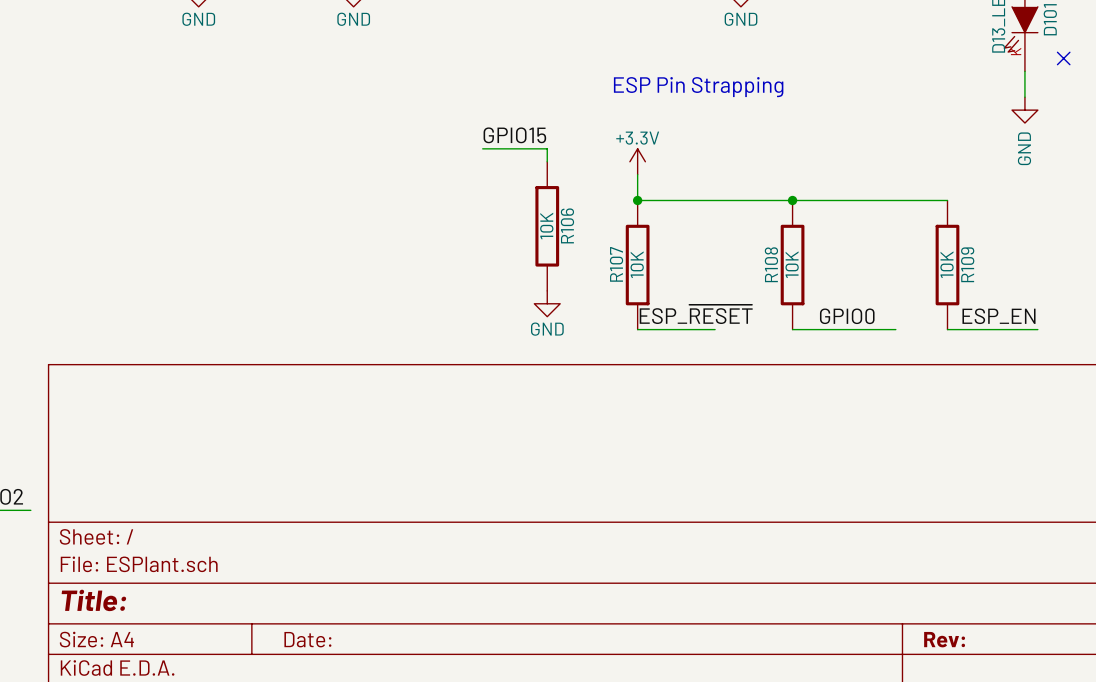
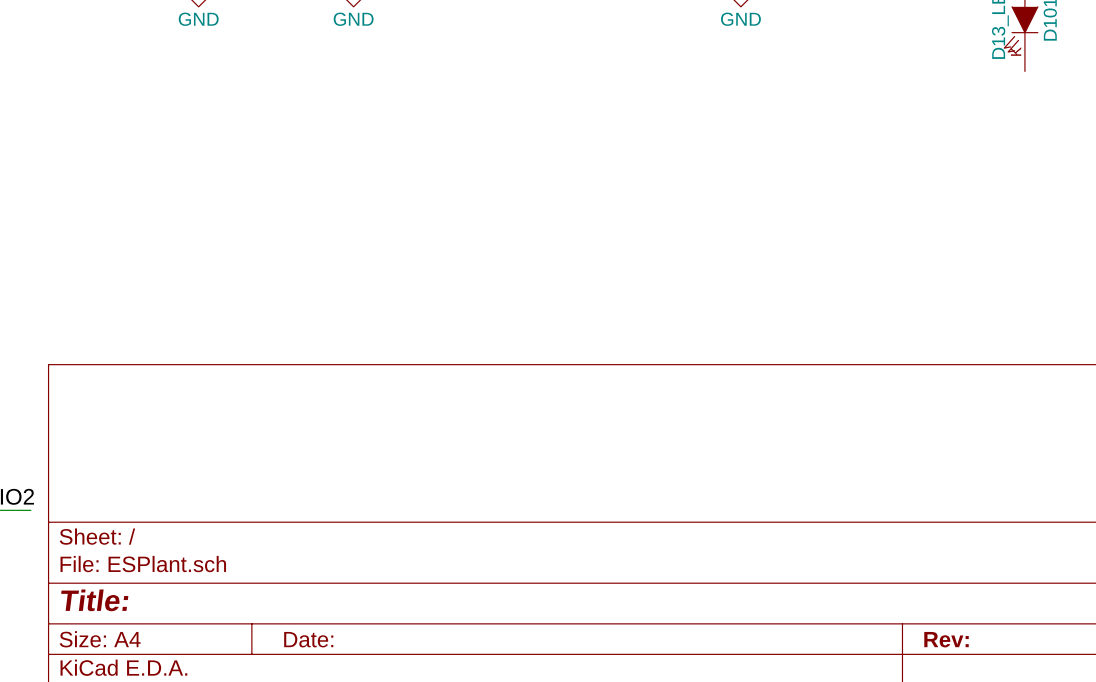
no-connect mark: (1063, 58) -> none
wire: (1024, 71) (1024, 97) -> none
text: ESP Pin Strapping (698, 87) -> none
power symbol: GND (1024, 110) -> none
label: GPIO15 (514, 135) -> none
wire: (482, 148) (547, 148) (547, 161) -> none
power symbol: +3.3V (637, 161) -> none
wire: (637, 174) (637, 200) (947, 200) -> none
junction: (637, 200) -> none
junction: (792, 200) -> none
R106: 10K (547, 226) -> none
R107: 10K (637, 265) -> none
R108: 10K (792, 265) -> none
R109: 10K (947, 265) -> none
power symbol: GND (547, 303) -> none
label: ESP_~{RESET} (696, 314) -> none
label: GPIO0 (847, 316) -> none
label: ESP_EN (998, 316) -> none
wire: (637, 329) (715, 329) -> none
wire: (792, 329) (895, 329) -> none
wire: (947, 329) (1037, 329) -> none

